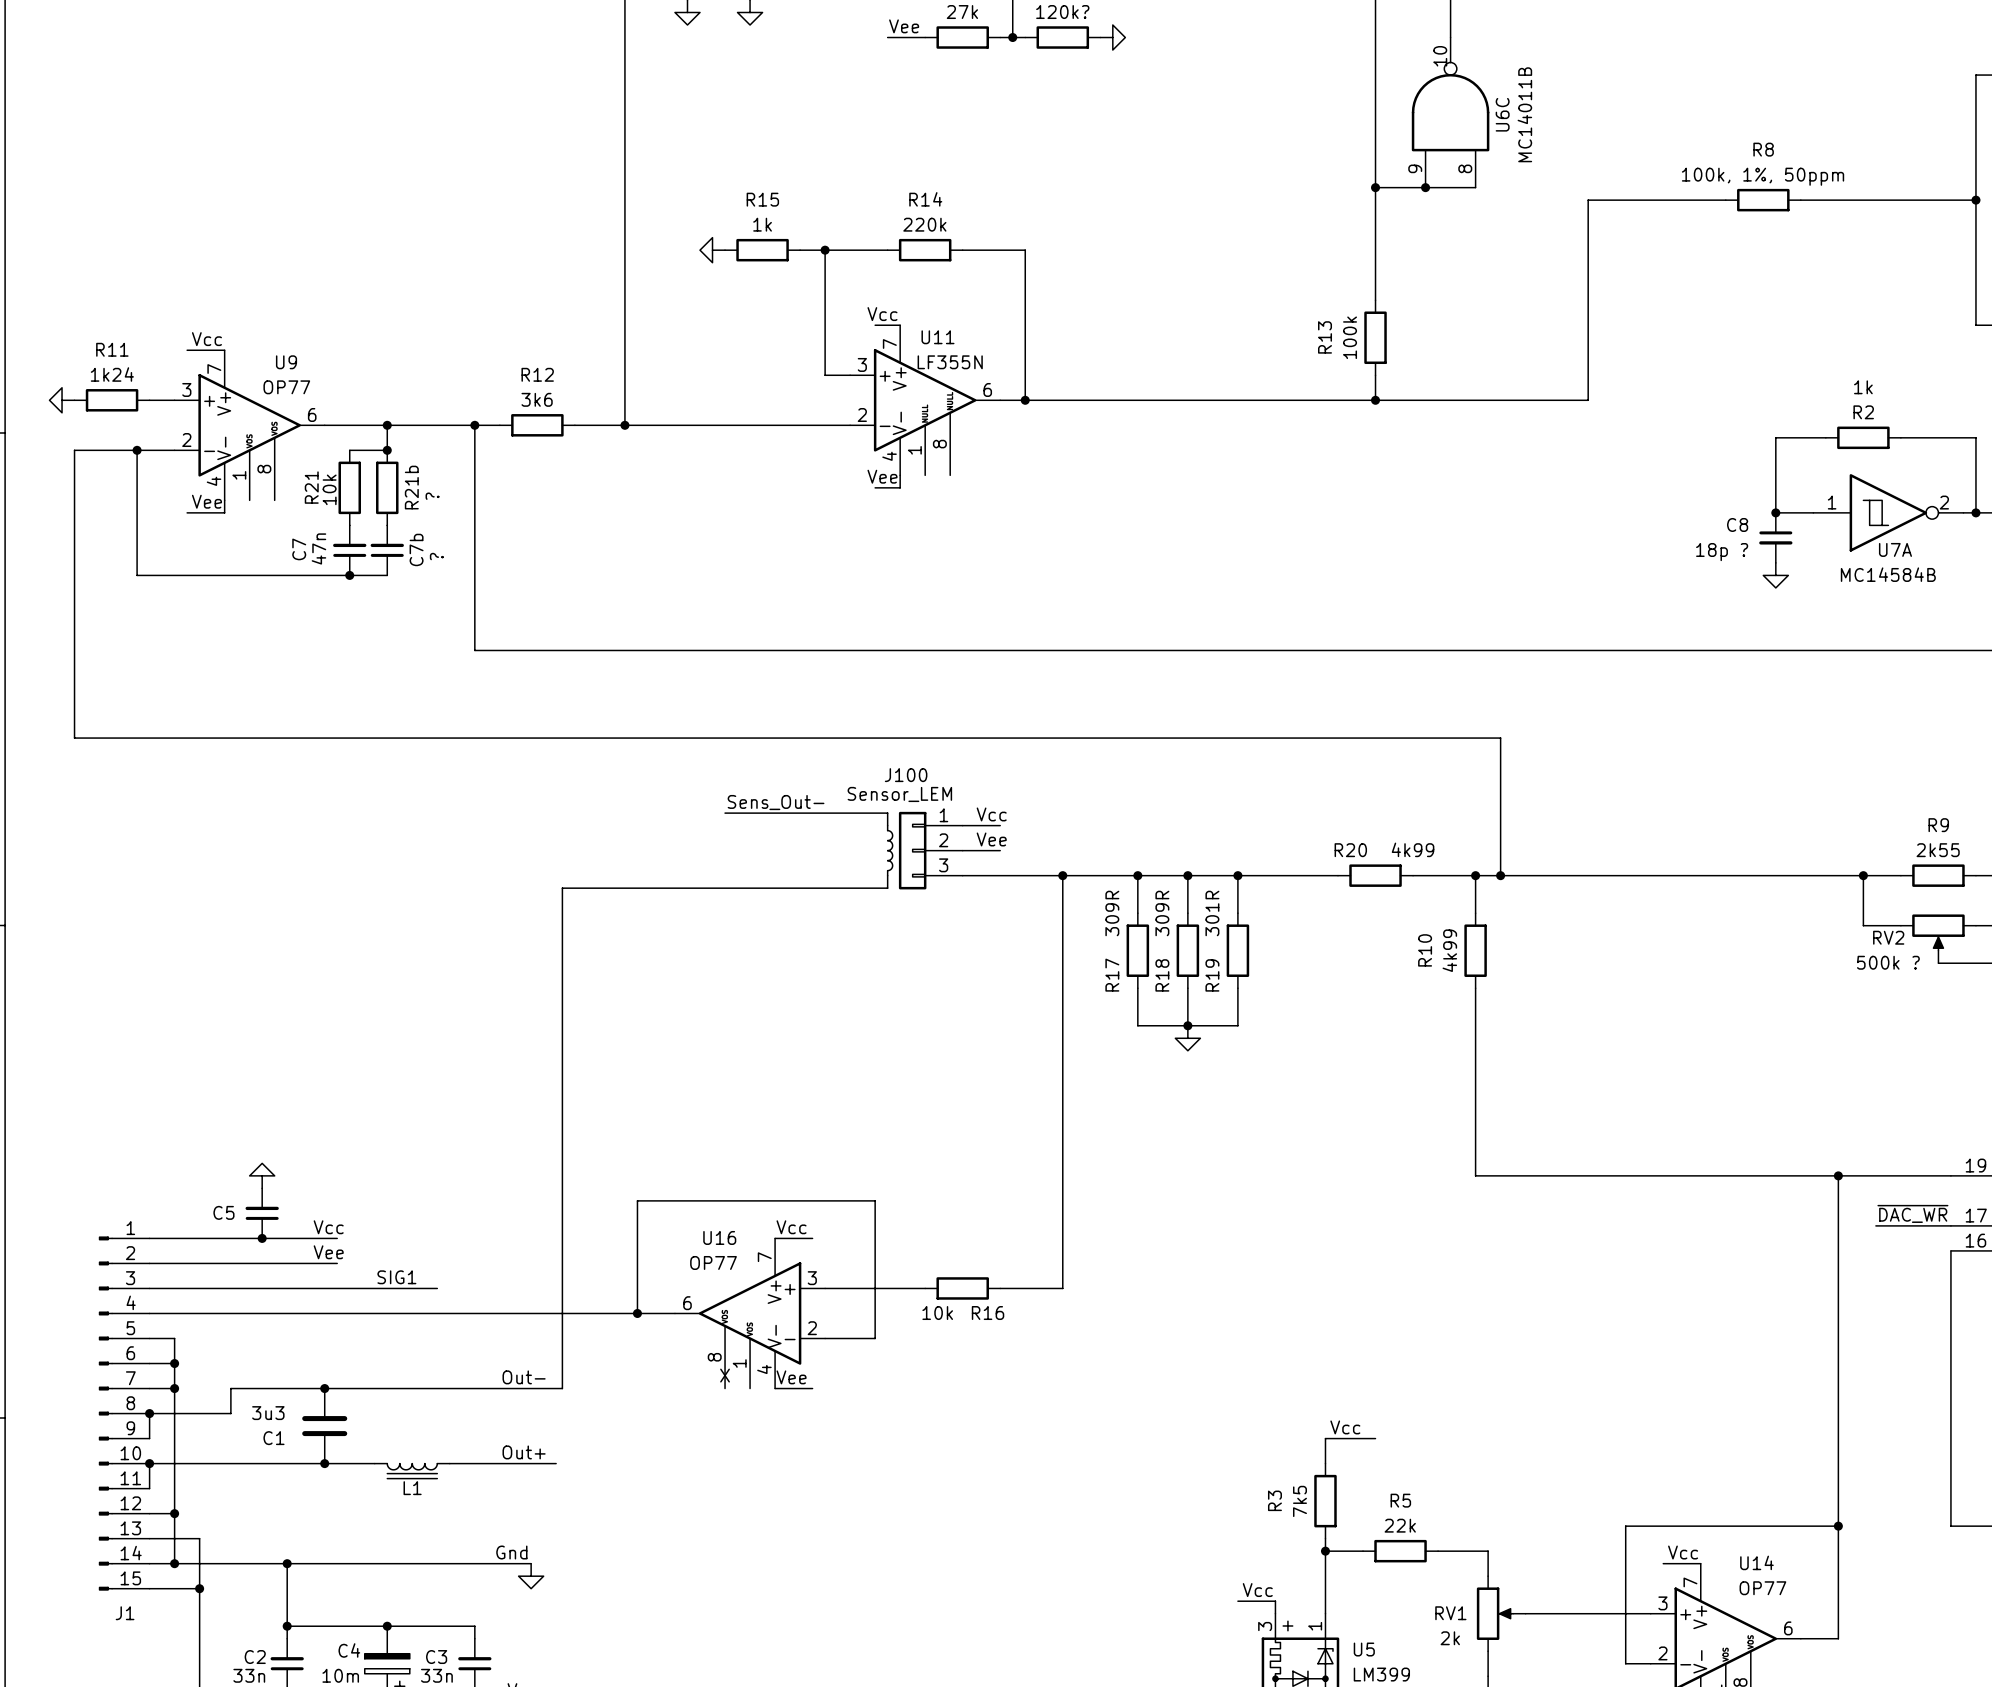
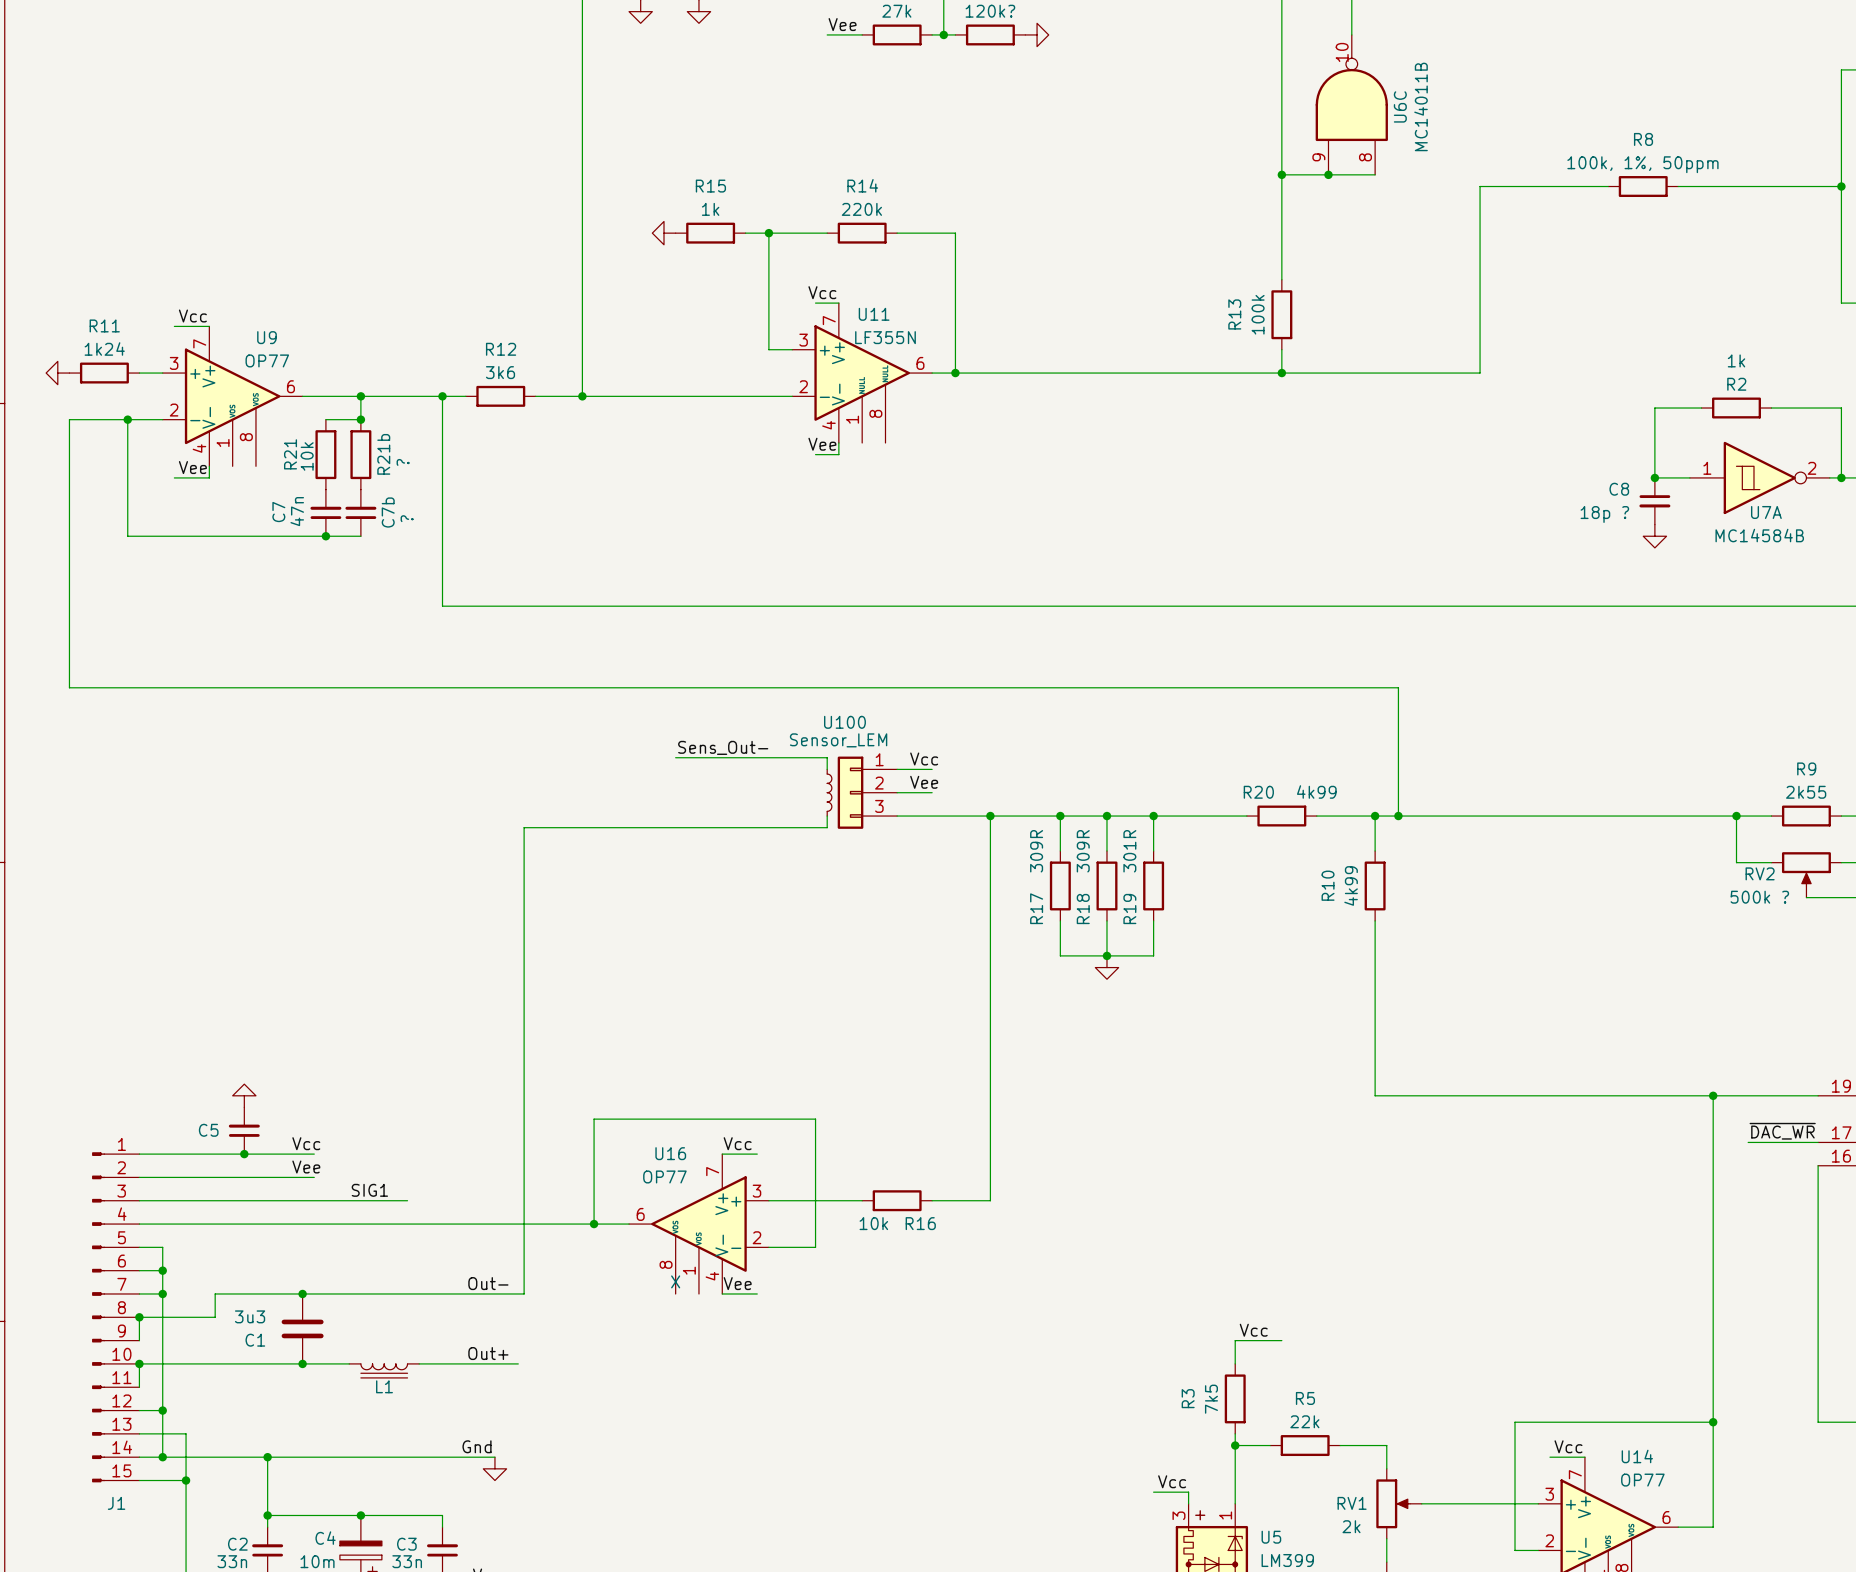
J100 name: J100 (906, 775) -> U100 (844, 722)

